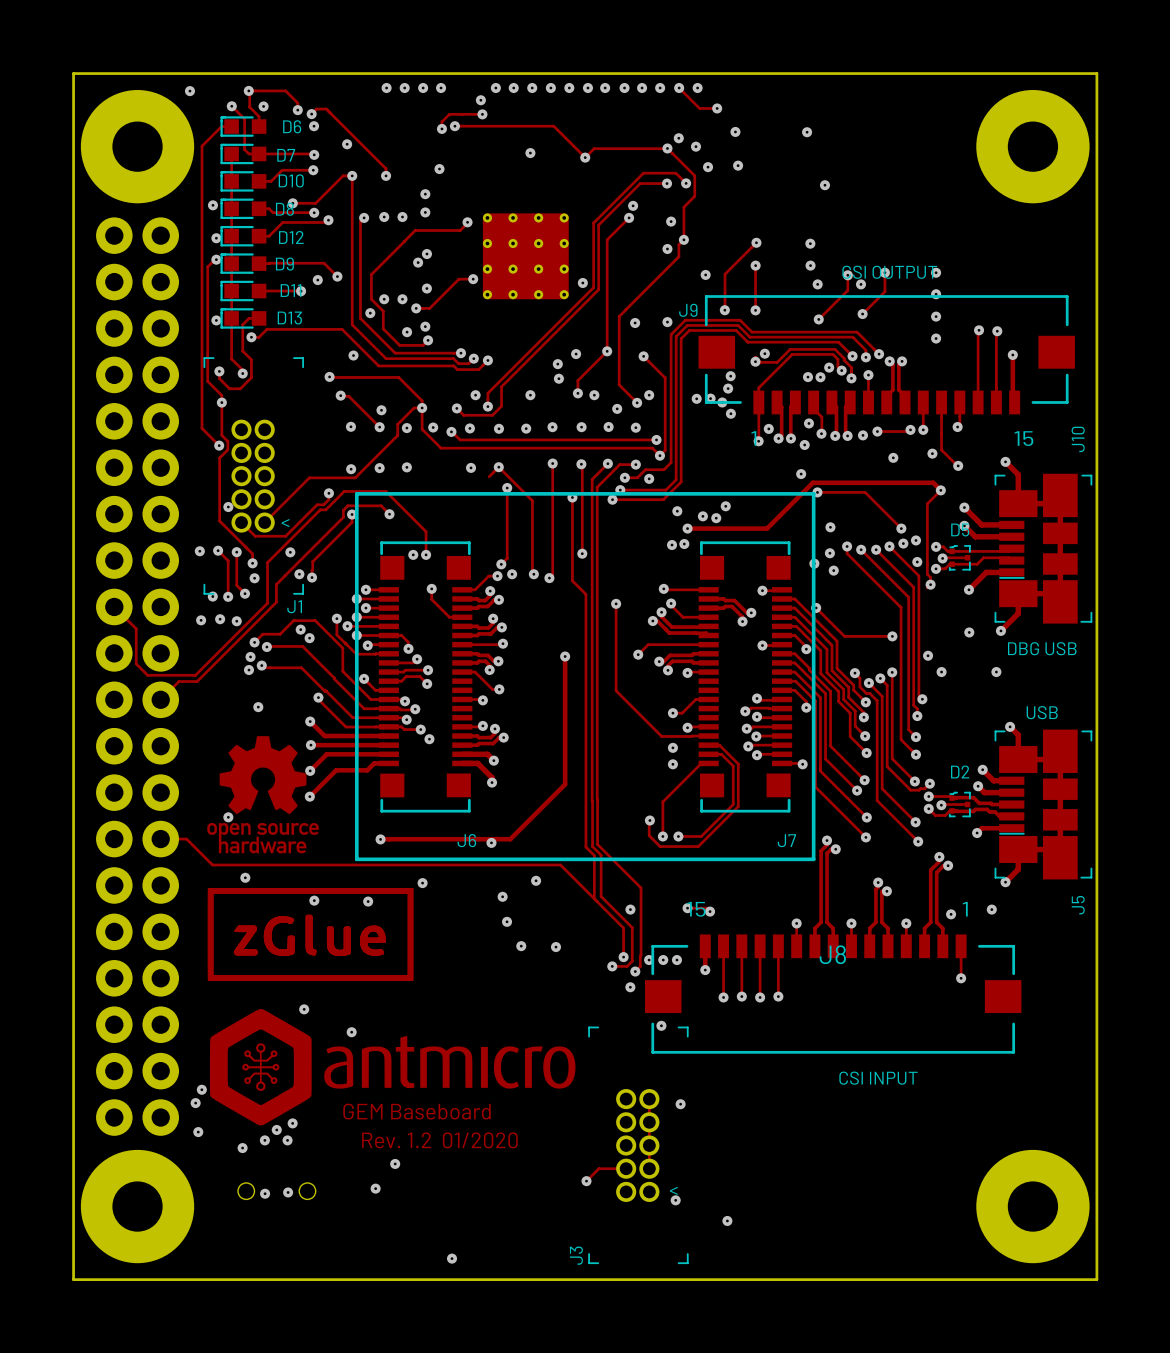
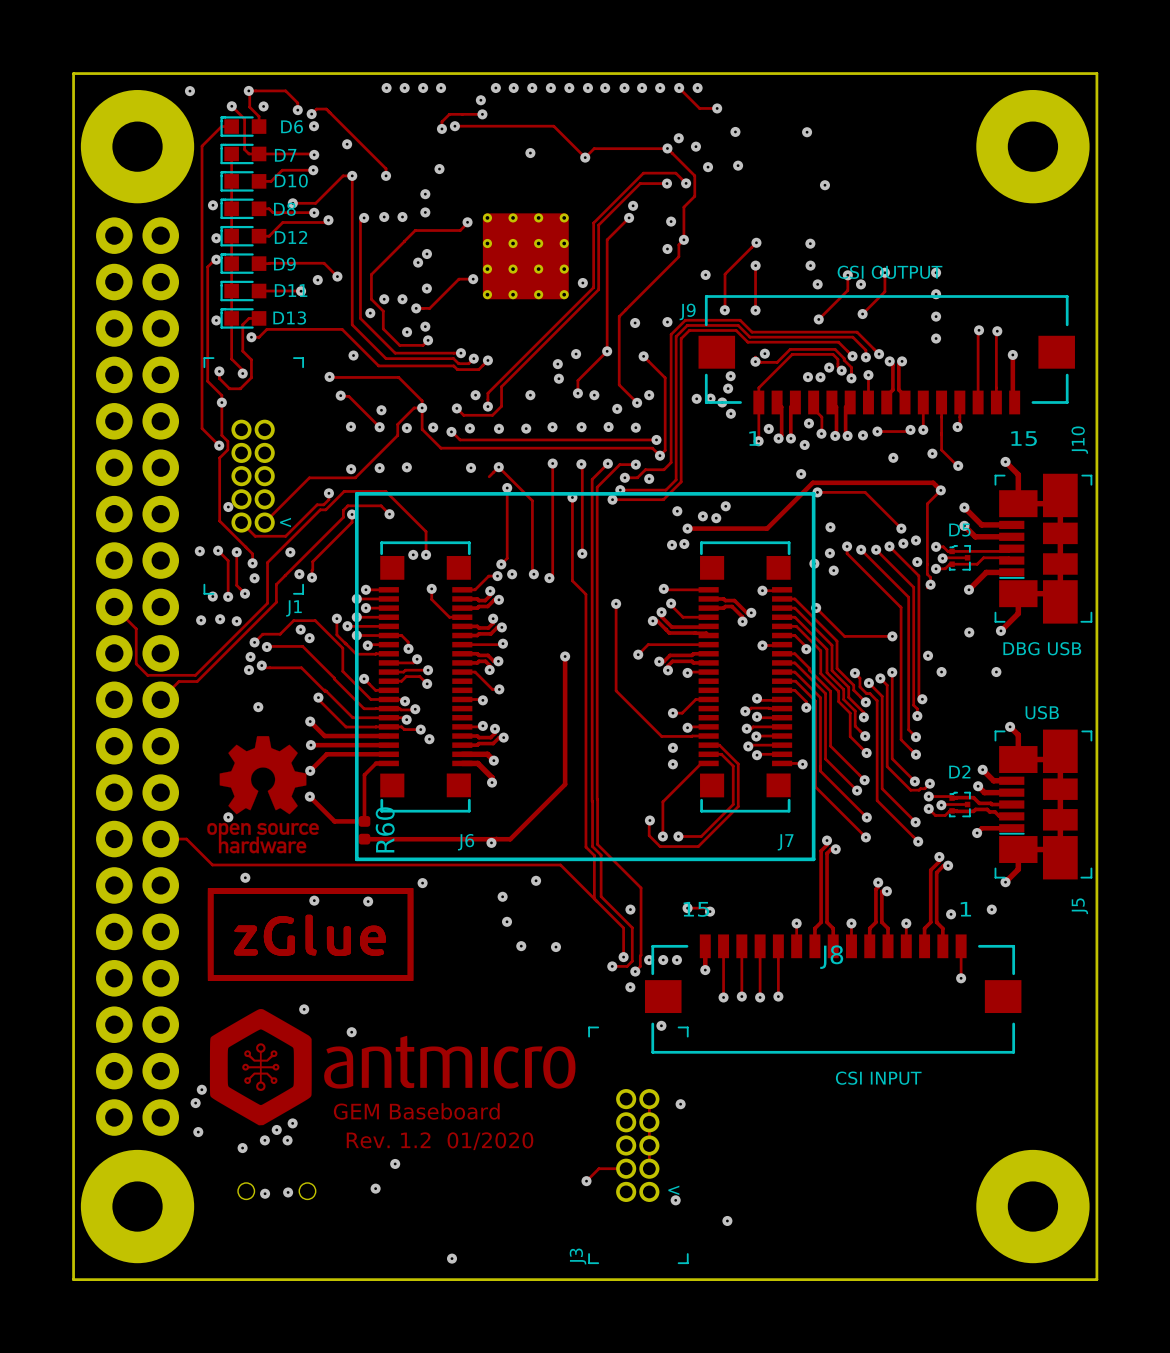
track: (376, 763) (367, 770) (336, 770) (309, 796) -> (376, 763) (364, 775) (364, 821) (334, 821) (309, 796)
R60: none -> (364, 830)
track: none -> (364, 839) (380, 839)
via: (380, 839) -> none

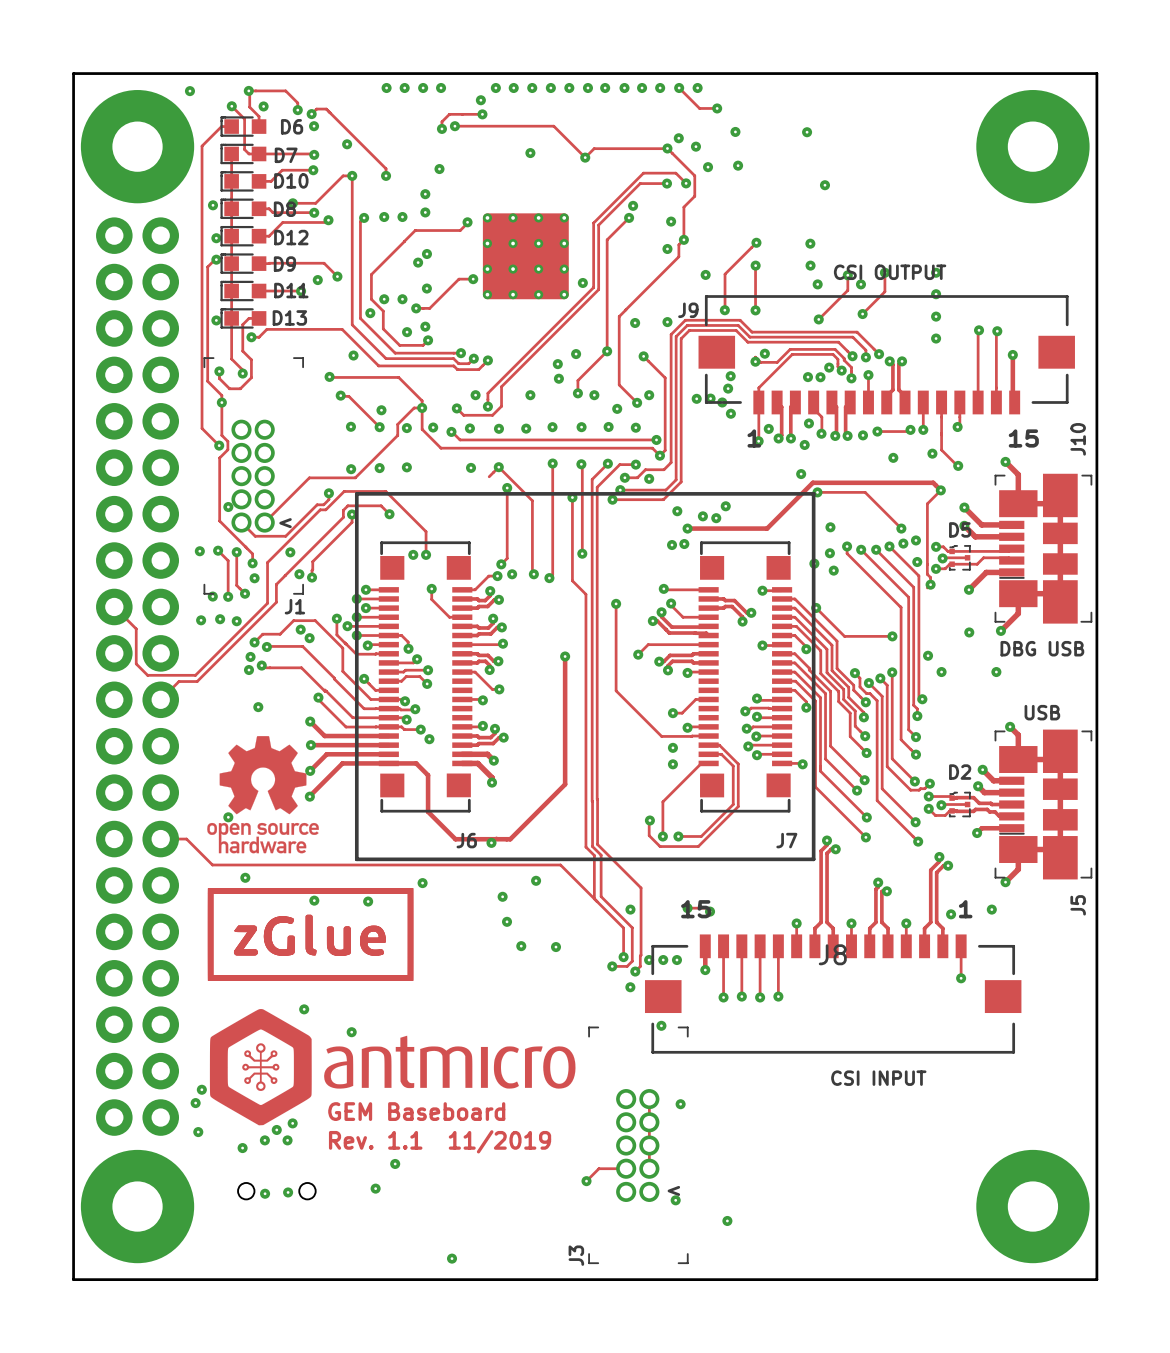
track: (376, 763) (364, 775) (364, 821) (334, 821) (309, 796) -> (376, 763) (342, 763) (309, 796)
R60: (364, 830) -> none
track: (364, 839) (455, 839) -> (388, 763) (416, 763) (428, 775) (428, 811) (455, 839)
text: Rev. 1.2 01/2020 (440, 1141) -> Rev. 1.1 11/2019 (440, 1141)

